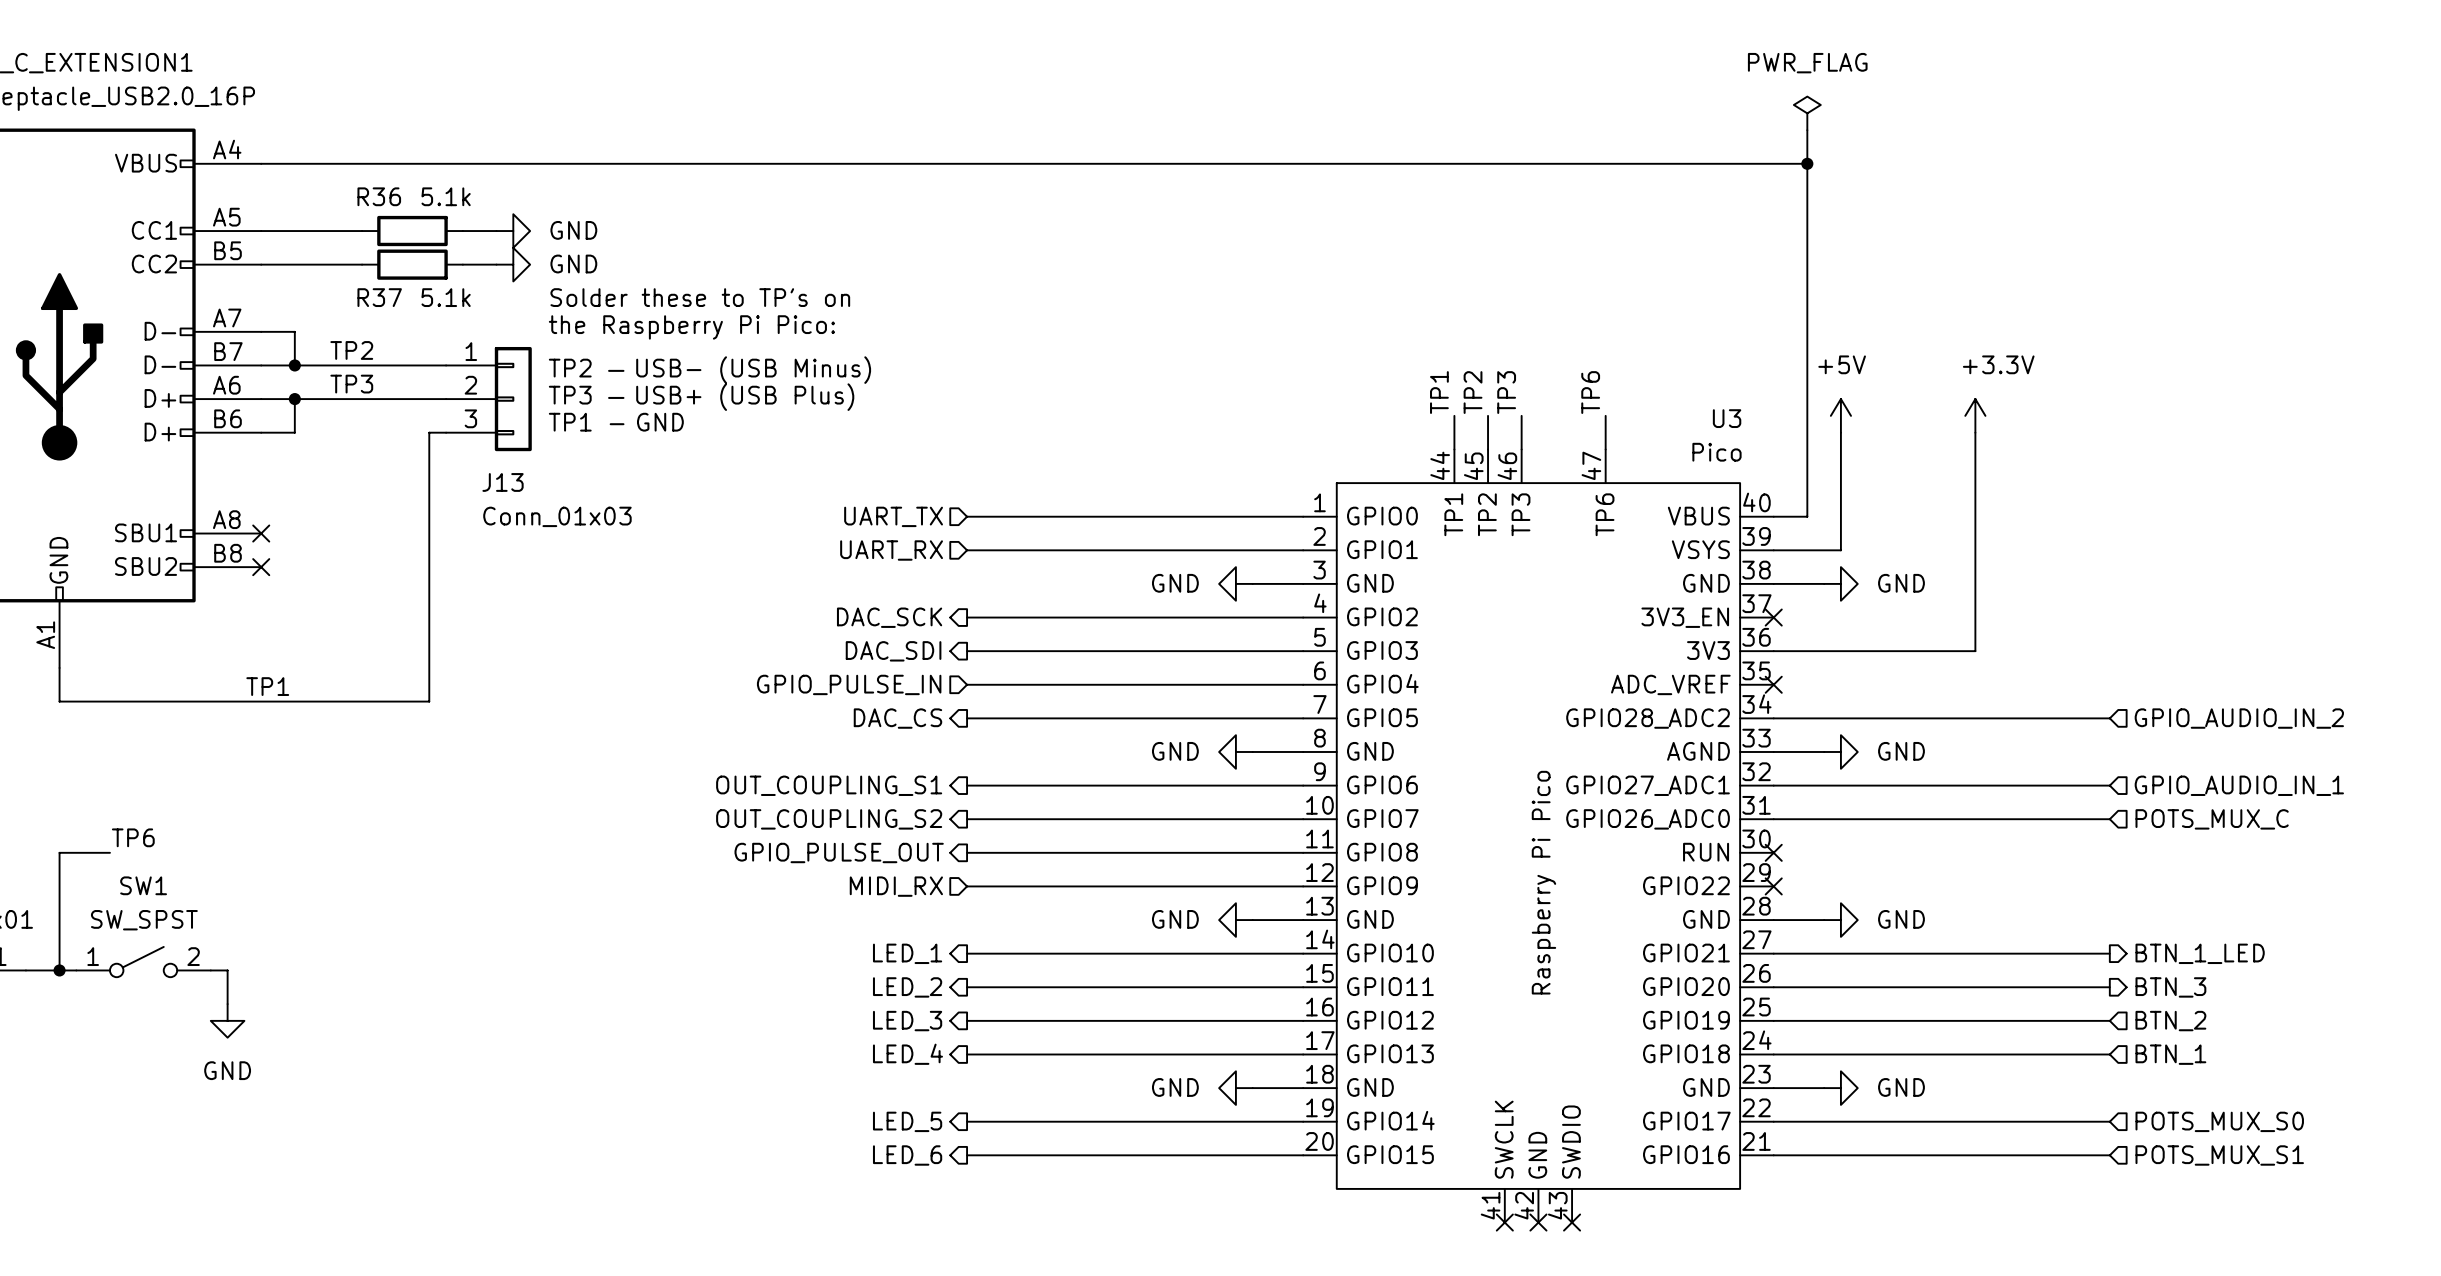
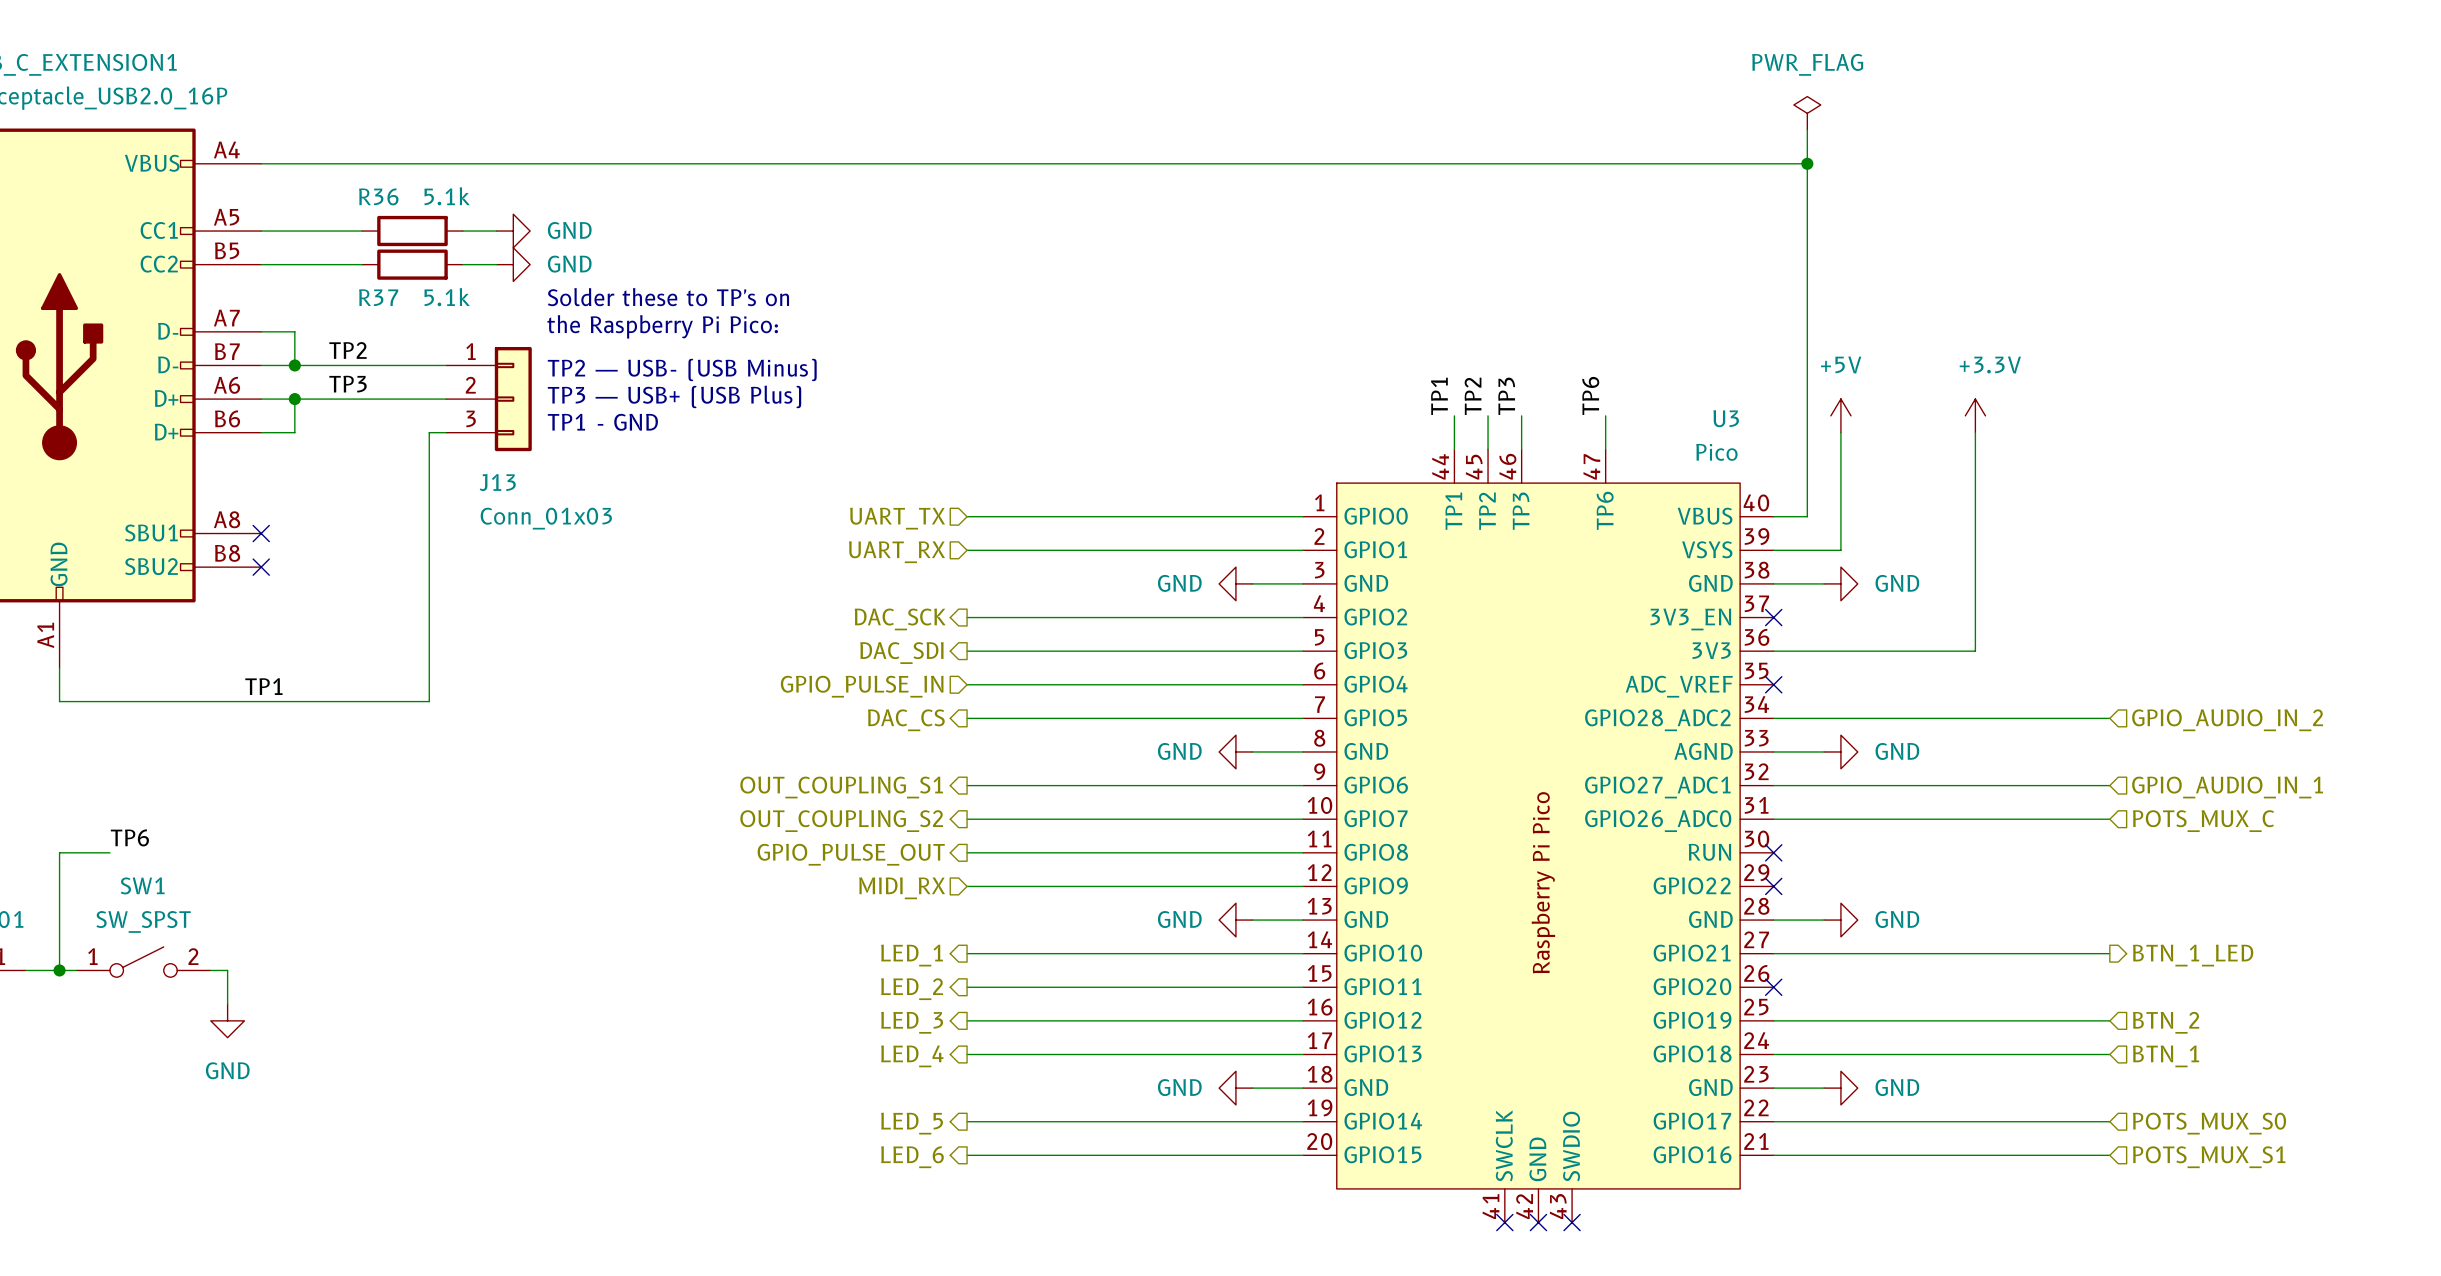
wire: (1773, 987) (2109, 987) -> none
no-connect mark: none -> (1773, 987)
hierarchical label: BTN_3 (2170, 987) -> none

